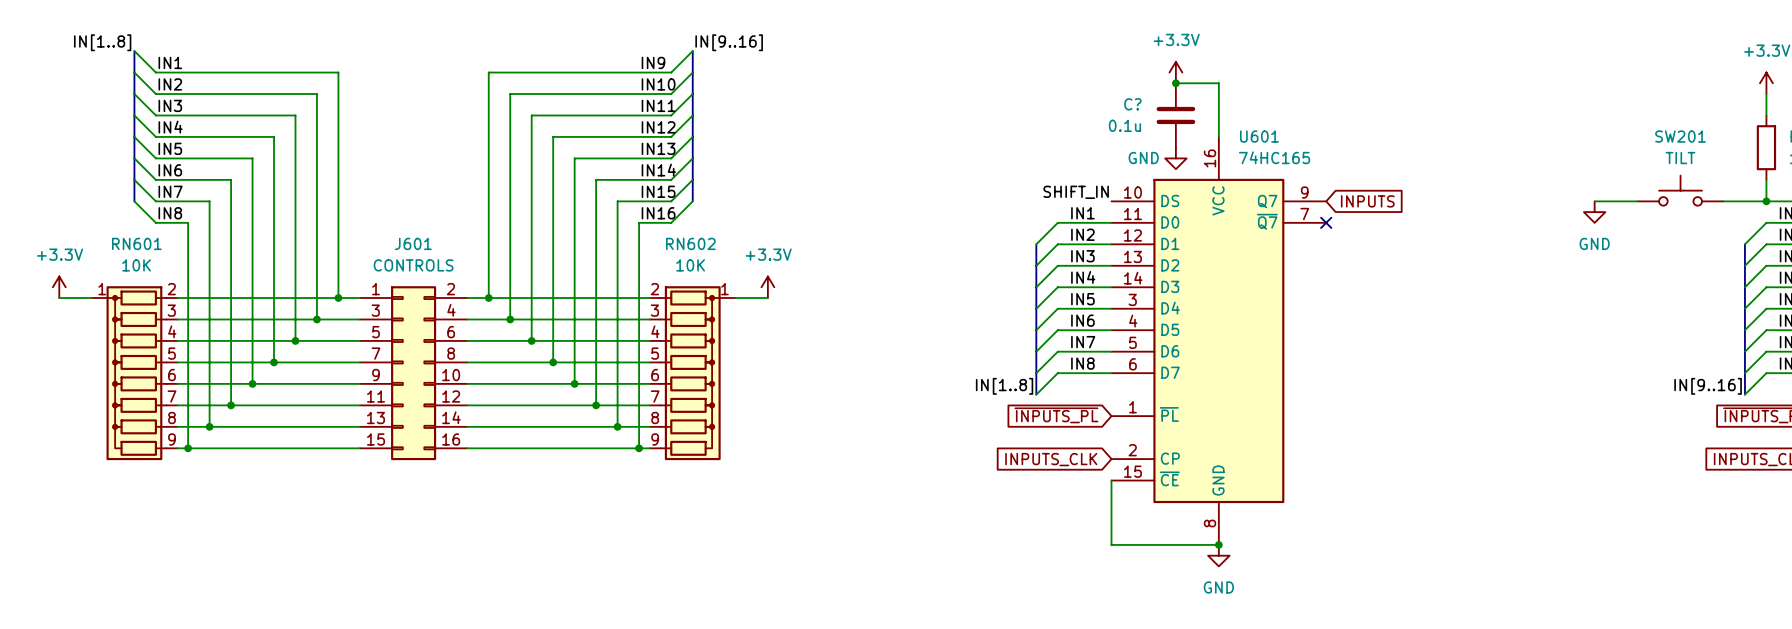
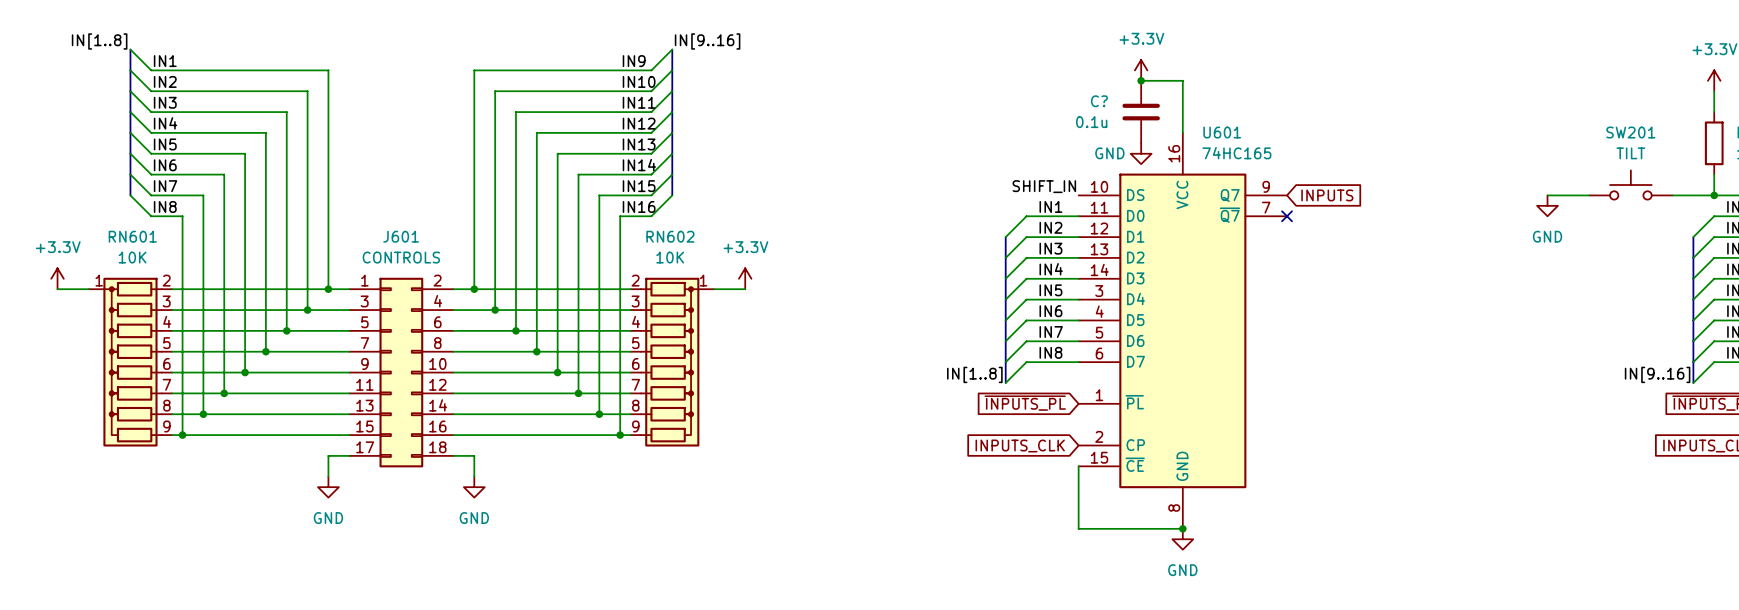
J601 symbol: [359, 286, 468, 461] -> [349, 277, 454, 468]
wire: none -> (349, 455) (328, 455) (328, 476)
wire: none -> (453, 455) (474, 455) (474, 476)
power symbol: none -> GND (328, 487)
power symbol: none -> GND (474, 487)

